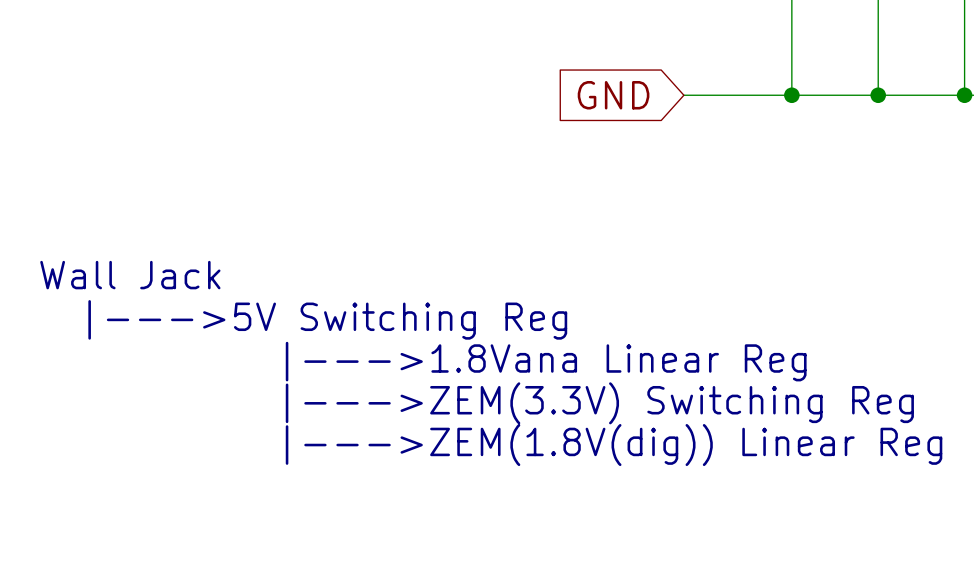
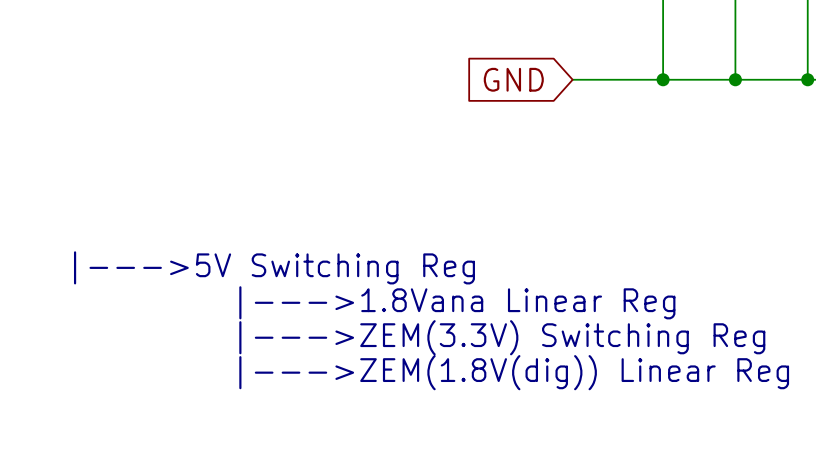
text: Wall Jack (130, 275) -> none

